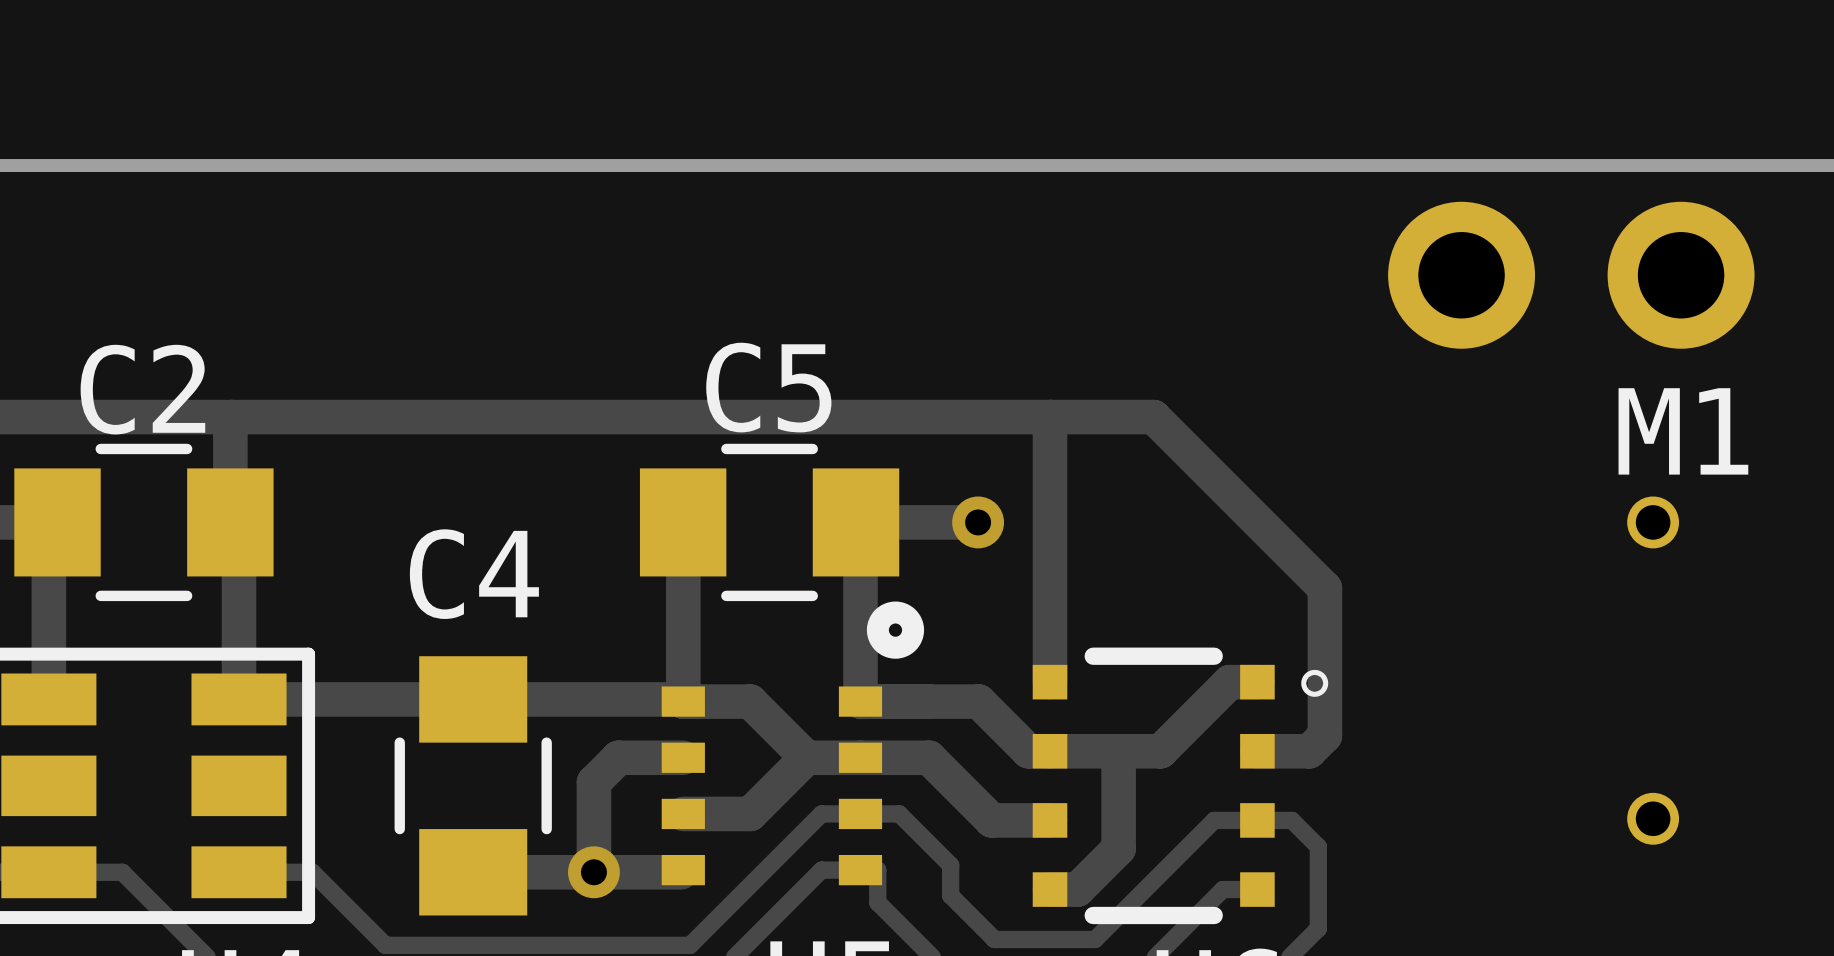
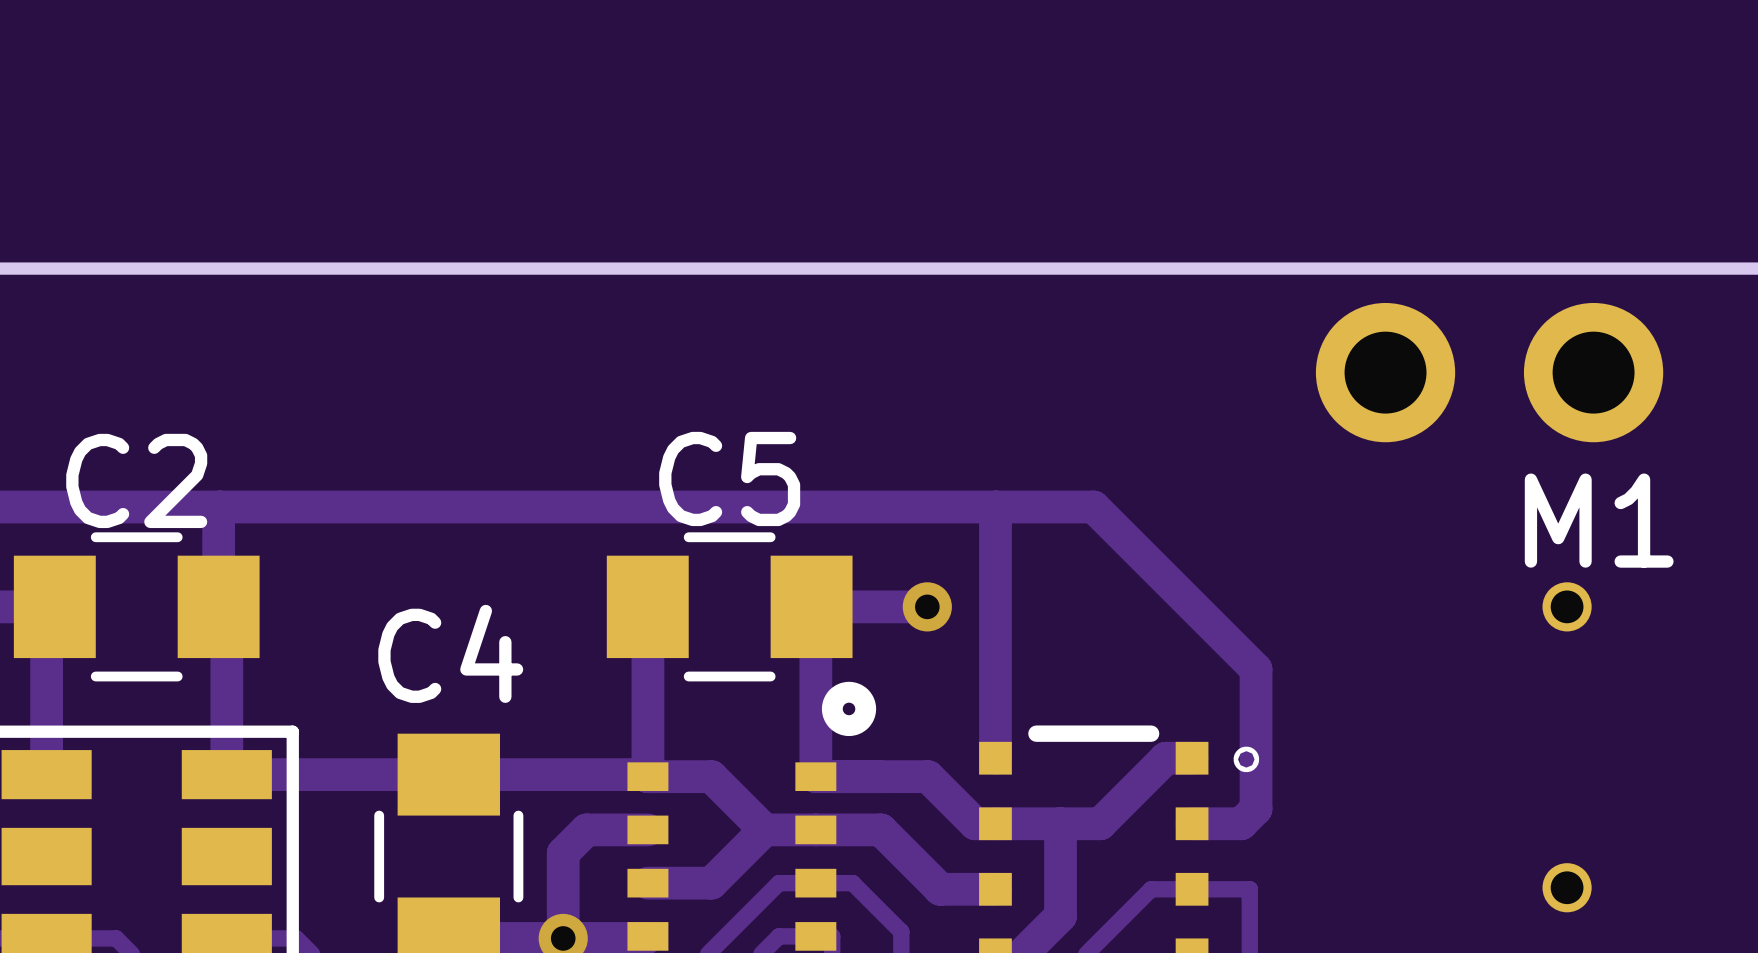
track: (1291, 820) (1318, 846) -> (1224, 889) (1249, 889) (1249, 914)

